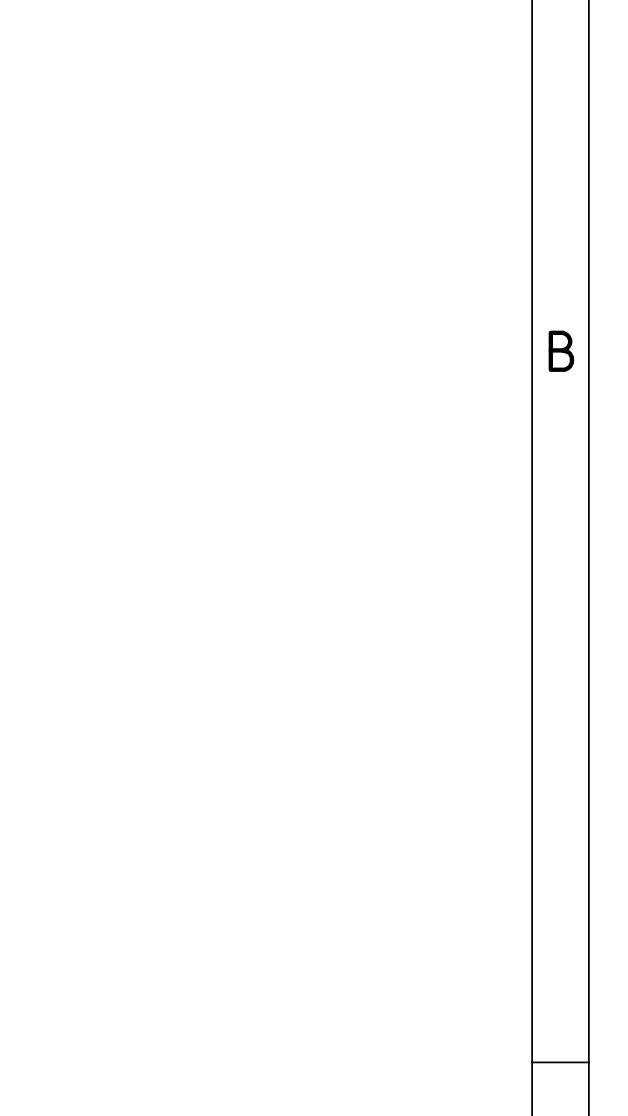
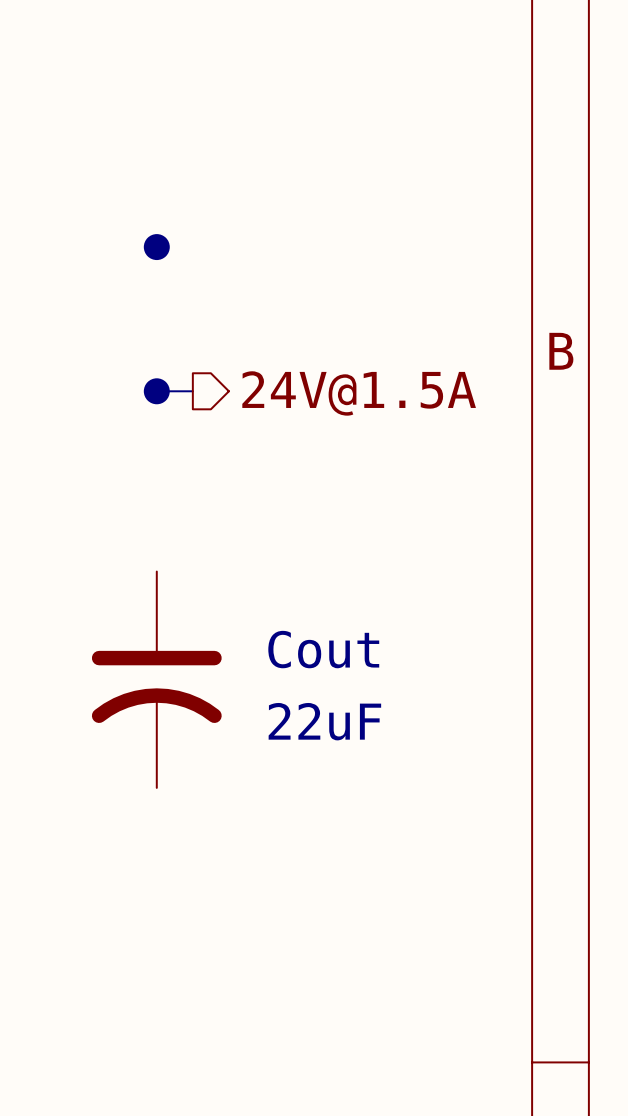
junction: none -> (156, 247)
wire: none -> (156, 391) (192, 391)
junction: none -> (156, 391)
hierarchical label: none -> 24V@1.5A (359, 393)
Cout: none -> 22uF (156, 679)

